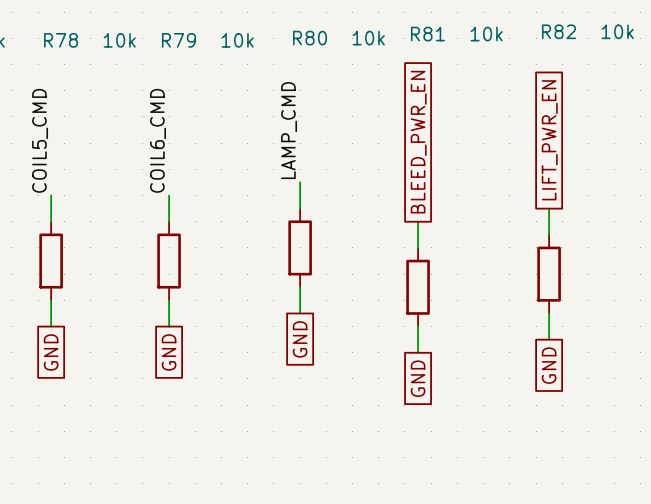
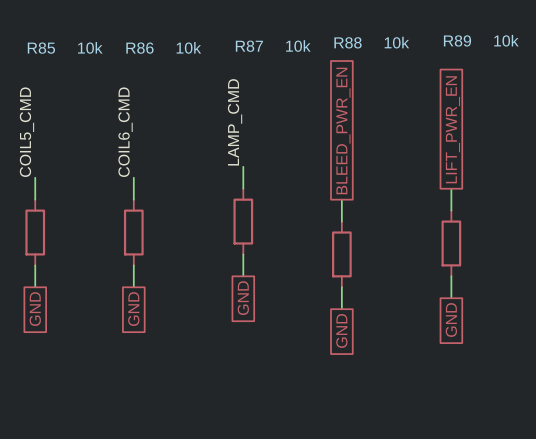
R82 name: R82 (559, 31) -> R89 (457, 40)
R81 name: R81 (427, 34) -> R88 (348, 42)
R80 name: R80 (310, 38) -> R87 (249, 46)
R78 name: R78 (61, 40) -> R85 (41, 48)
R79 name: R79 (178, 40) -> R86 (139, 48)

